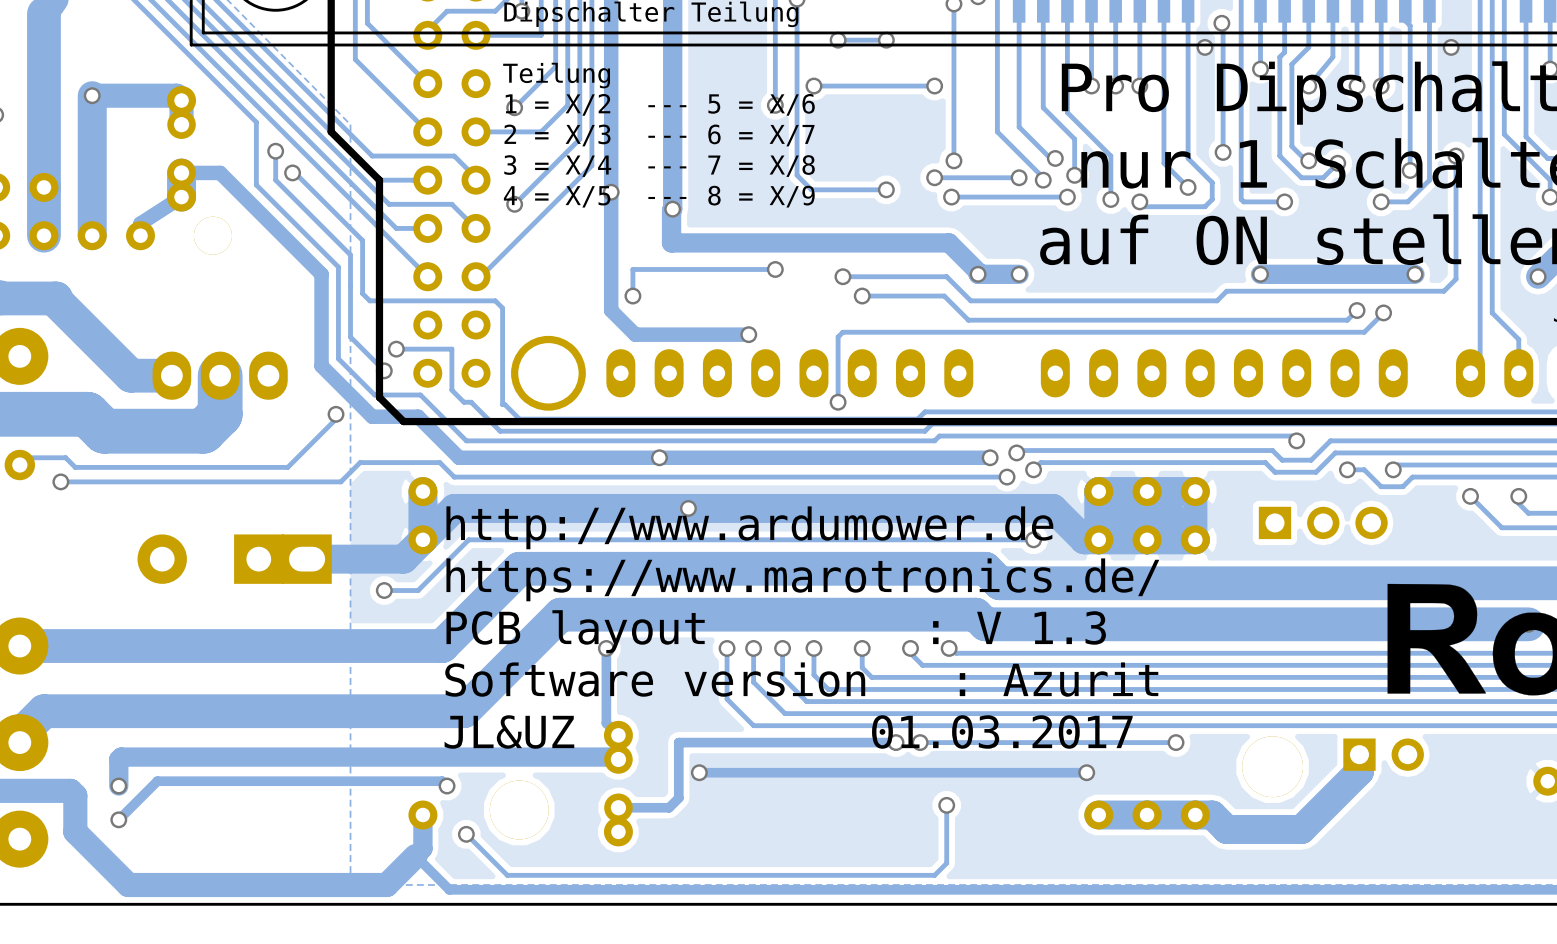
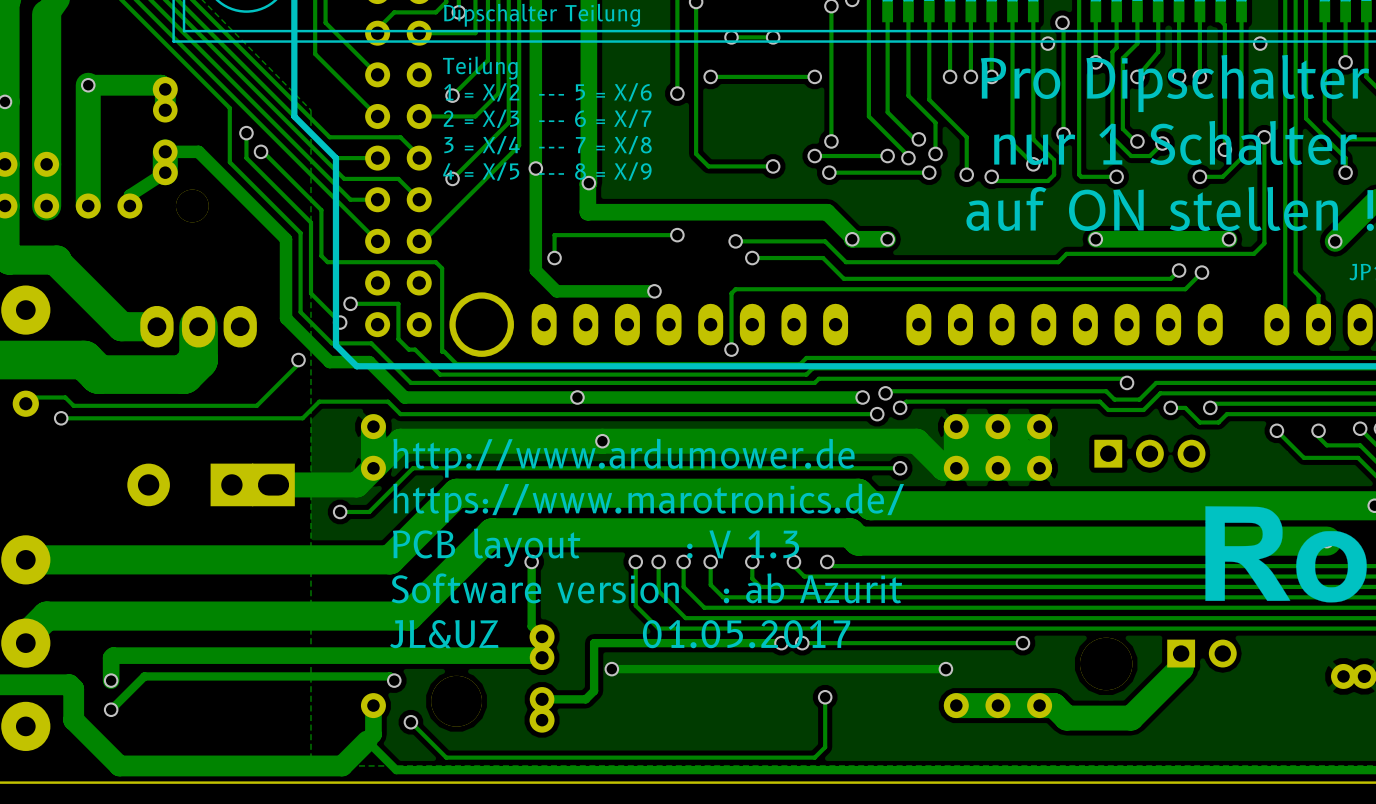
text: Software version : Azurit (801, 679) -> Software version : ab Azurit (646, 588)
text: JL&UZ 01.03.2017 (788, 731) -> JL&UZ 01.05.2017 (620, 634)

